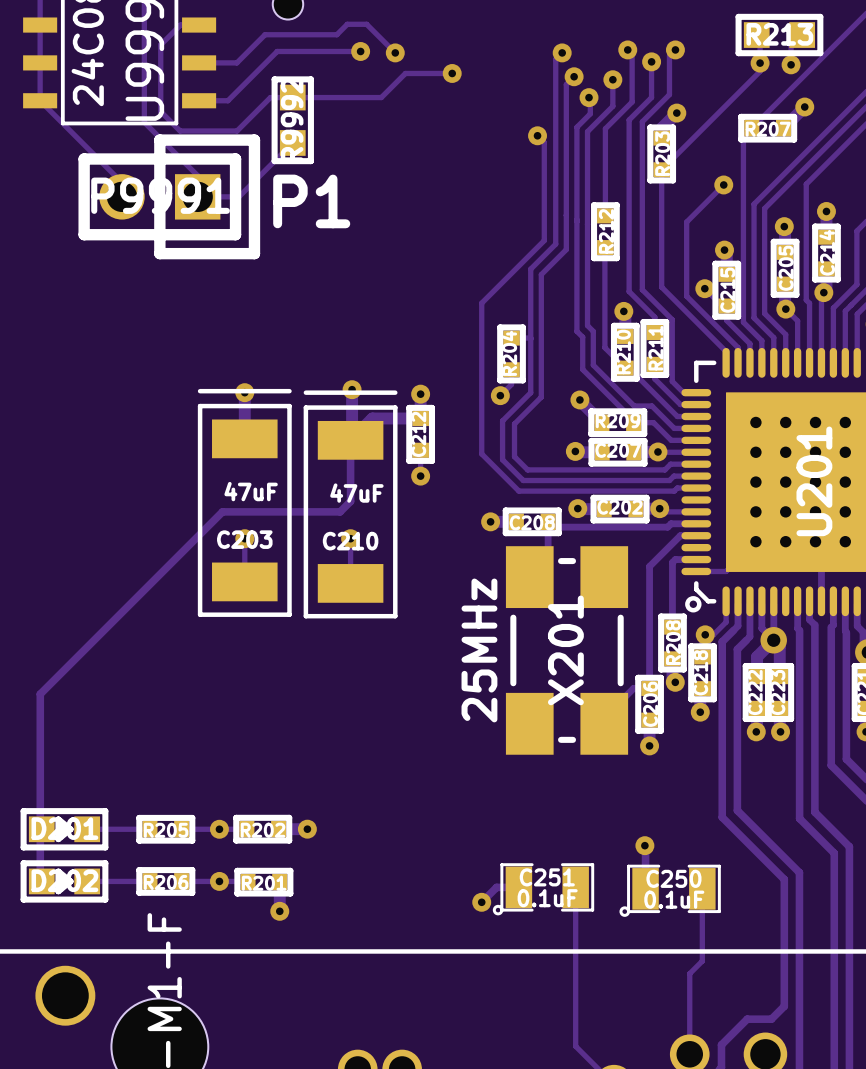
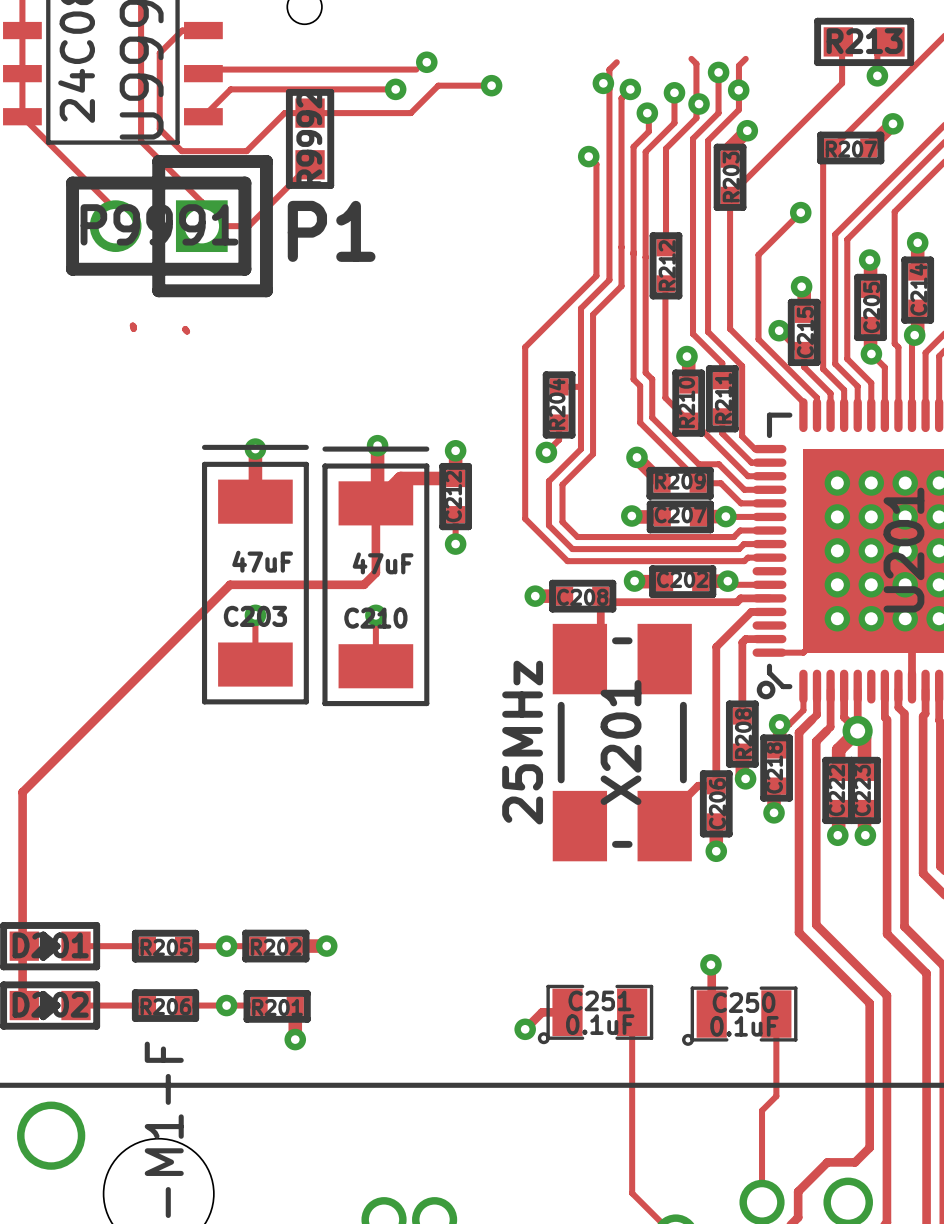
via: (627, 49) -> none
via: (675, 49) -> none
track: (360, 51) (277, 51) (227, 100) (199, 100) -> (395, 89) (230, 89) (203, 116)
via position: (360, 51) -> (395, 89)
track: (395, 52) (366, 24) (347, 24) (336, 34) (265, 34) (236, 62) (201, 62) -> (416, 69) (207, 69) (203, 73) (207, 74) (206, 73)
via position: (562, 52) -> (603, 83)
via: (760, 63) -> none
via: none -> (738, 90)
via: none -> (699, 104)
track: none -> (132, 325) (133, 326) (133, 328) (132, 325)
track: none -> (185, 328) (187, 331) (185, 329) (185, 328)

